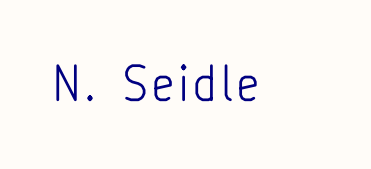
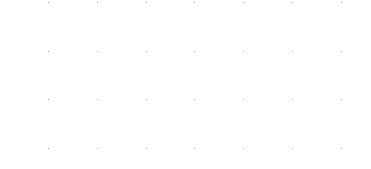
text: N. Seidle (156, 82) -> none

